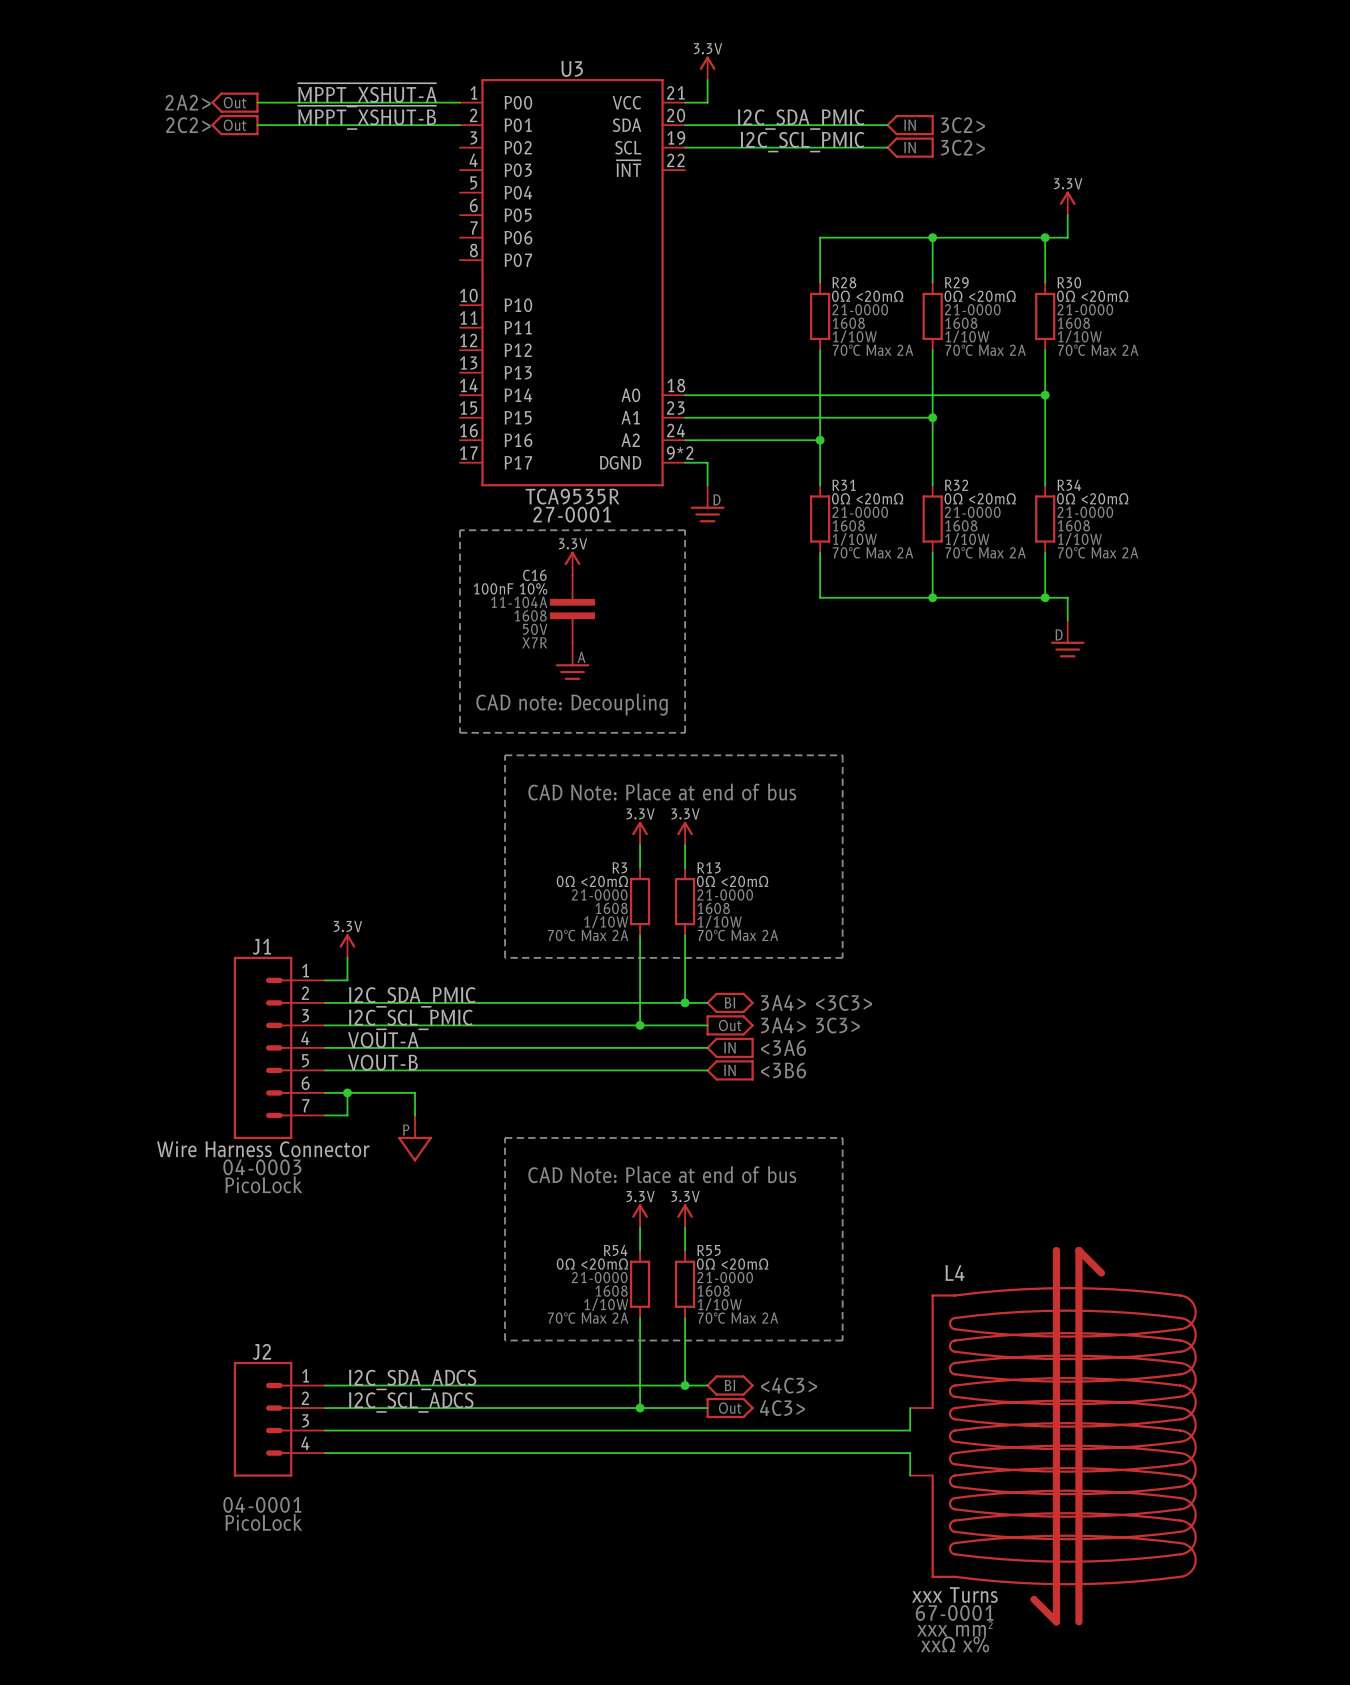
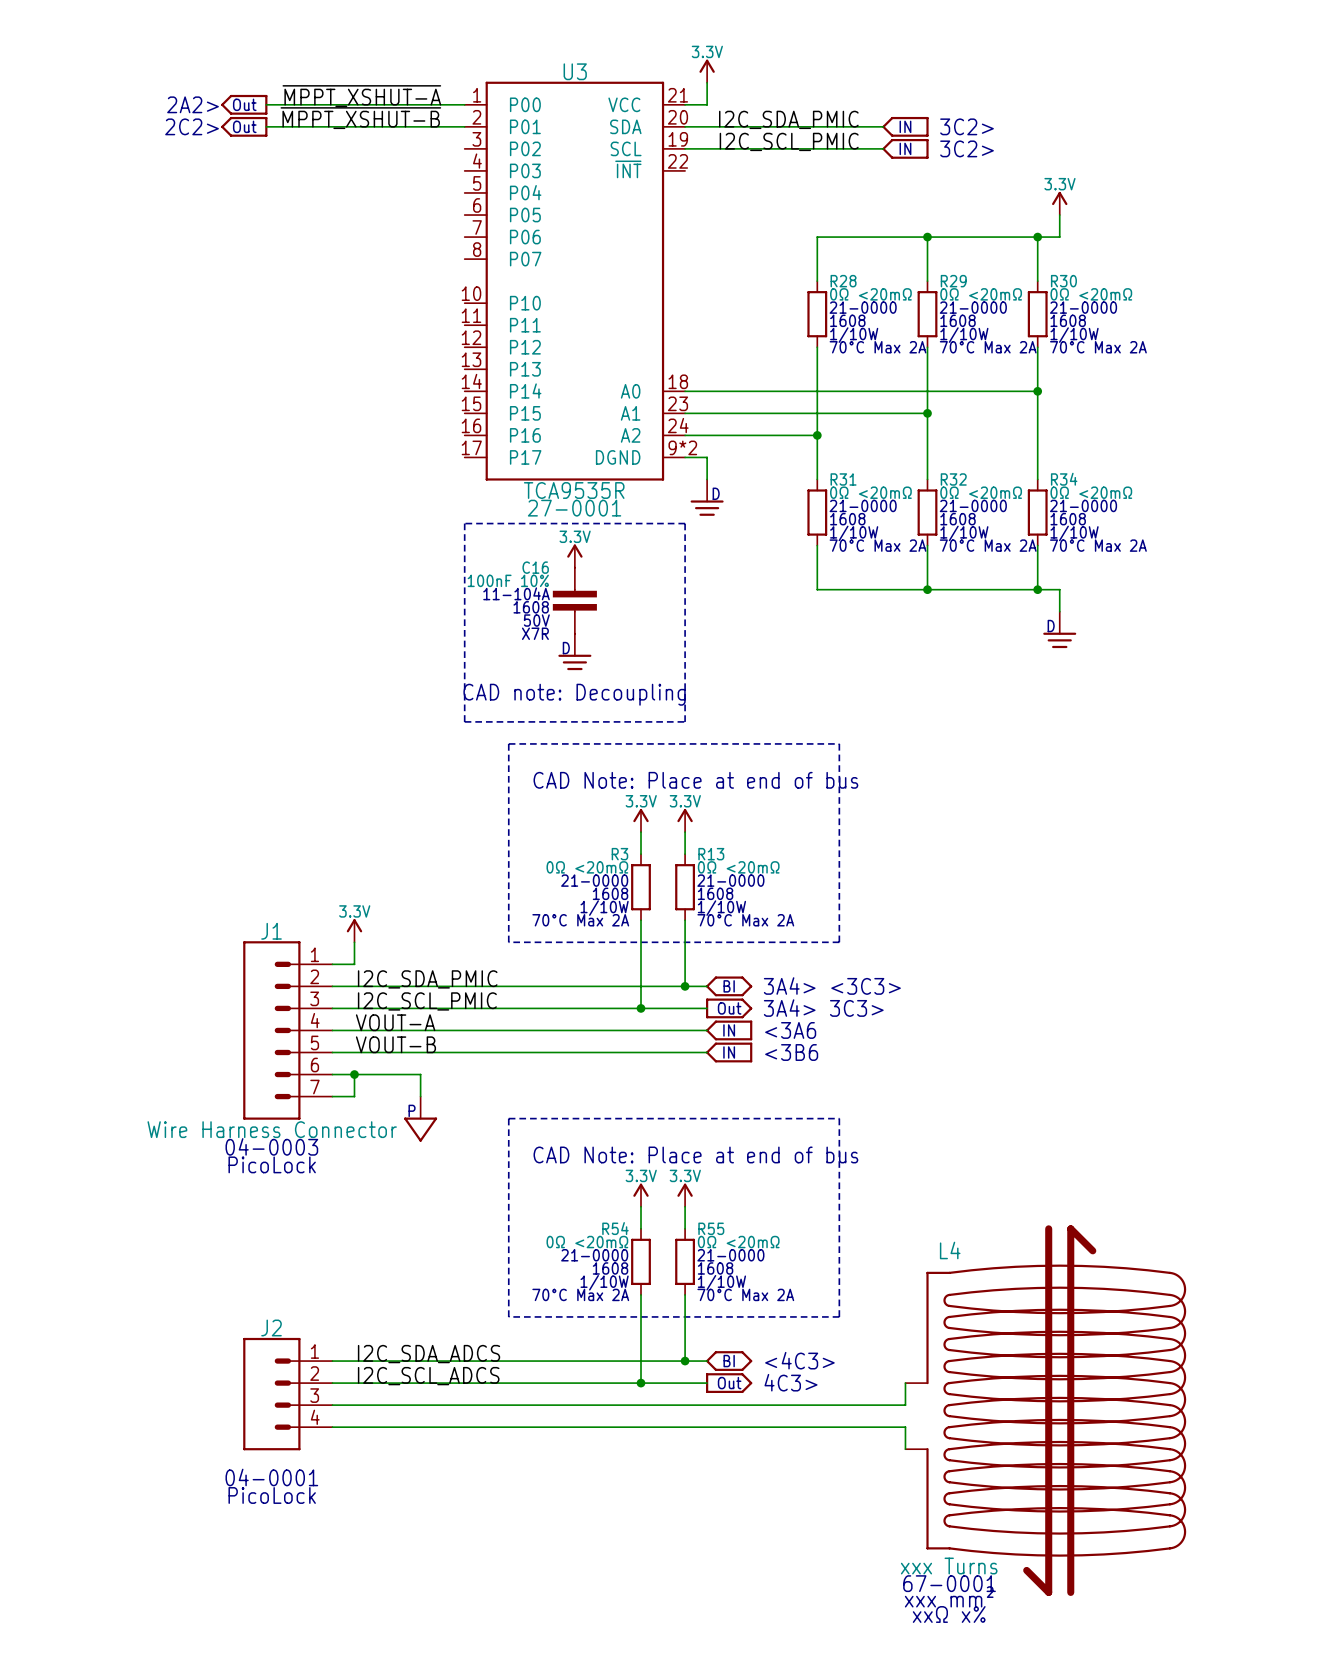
power symbol text: none -> D (566, 648)
power symbol text: A (581, 657) -> none

